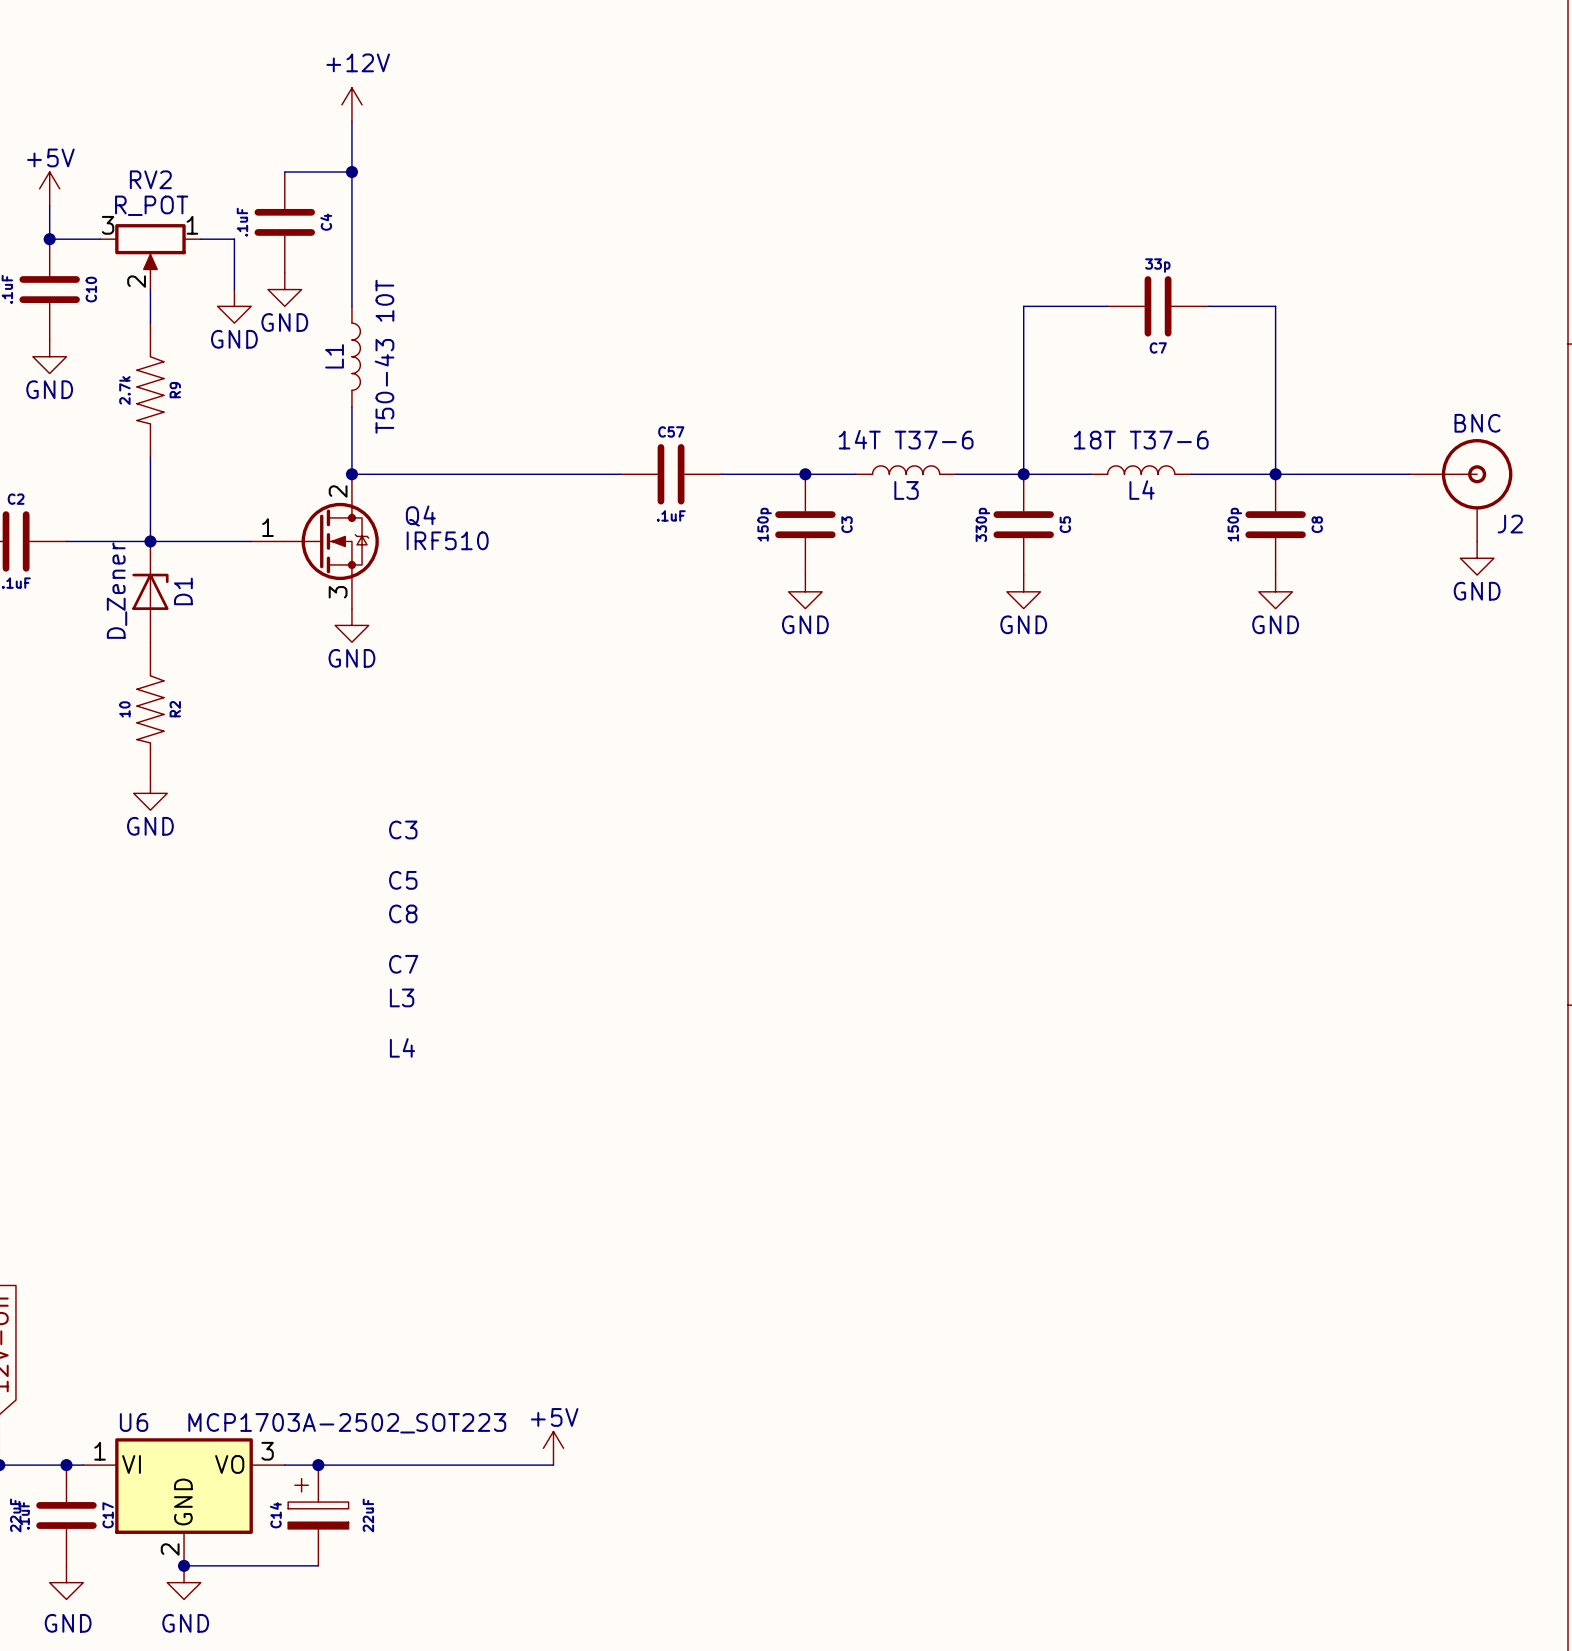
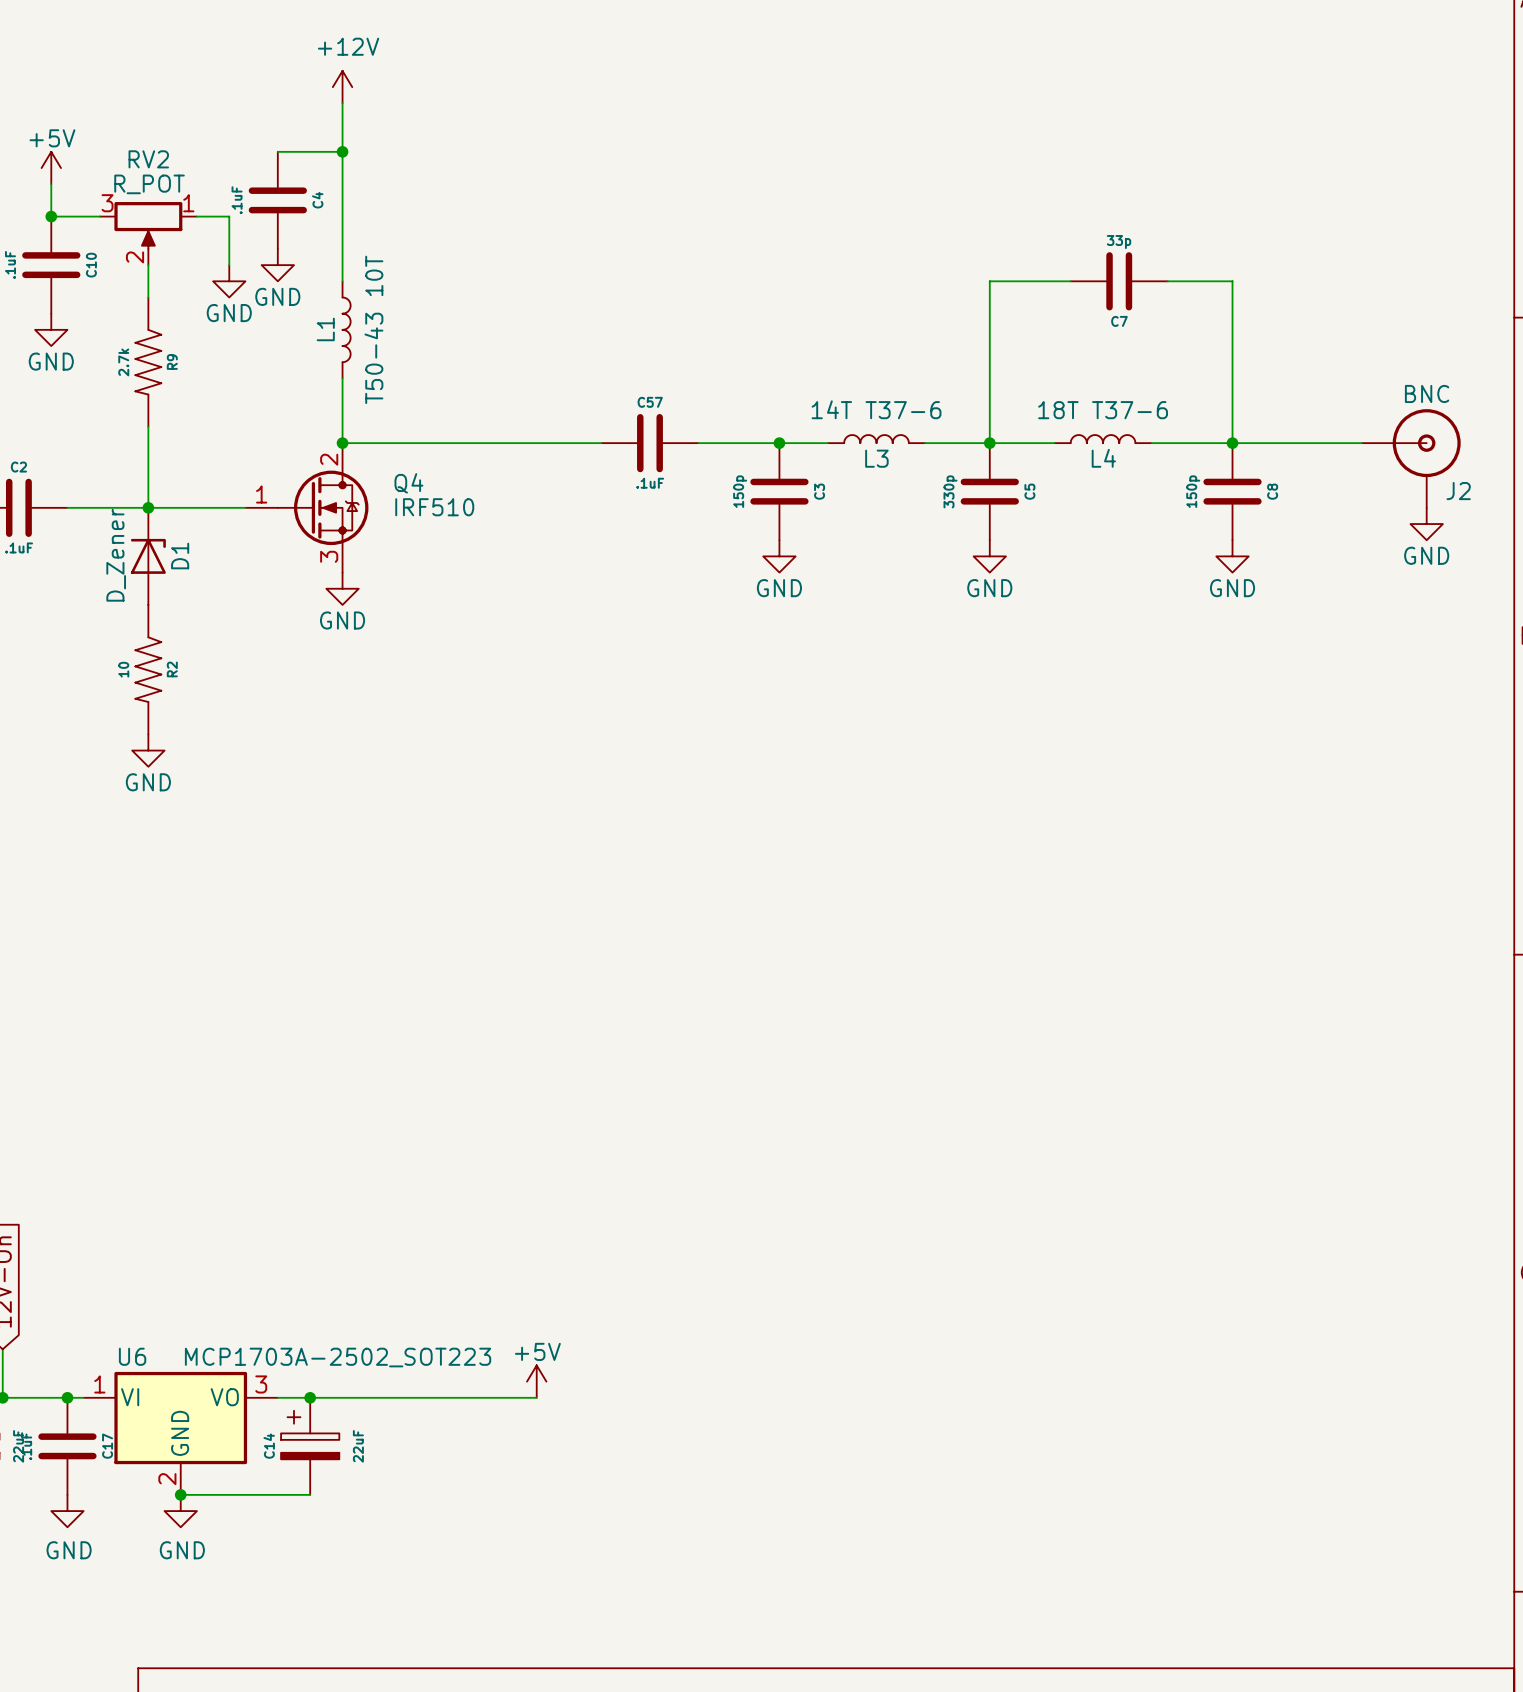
text: C3 (403, 829) -> none
text: C5 (403, 880) -> none
text: C8 (403, 913) -> none
text: C7 (403, 964) -> none
text: L3 (402, 997) -> none
text: L4 (402, 1047) -> none

